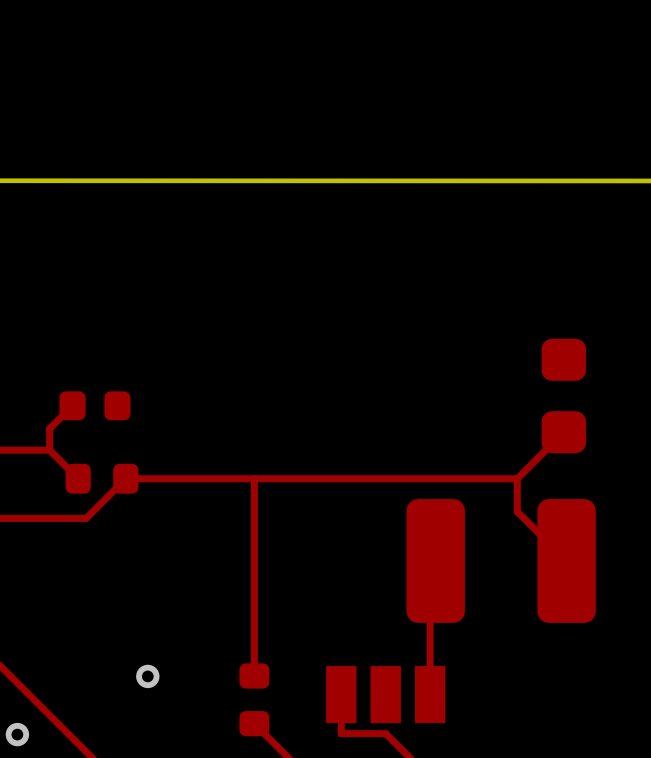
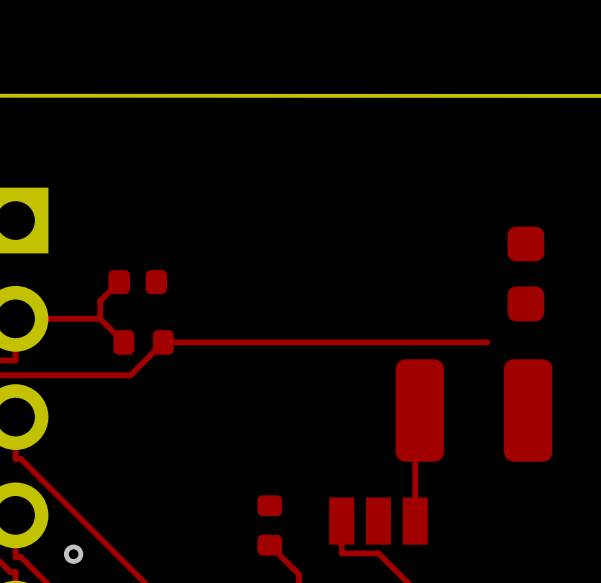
top track: (563, 432) (517, 478) (517, 511) (566, 560) -> none
top track: (254, 478) (254, 675) -> none
via: (147, 676) -> none

